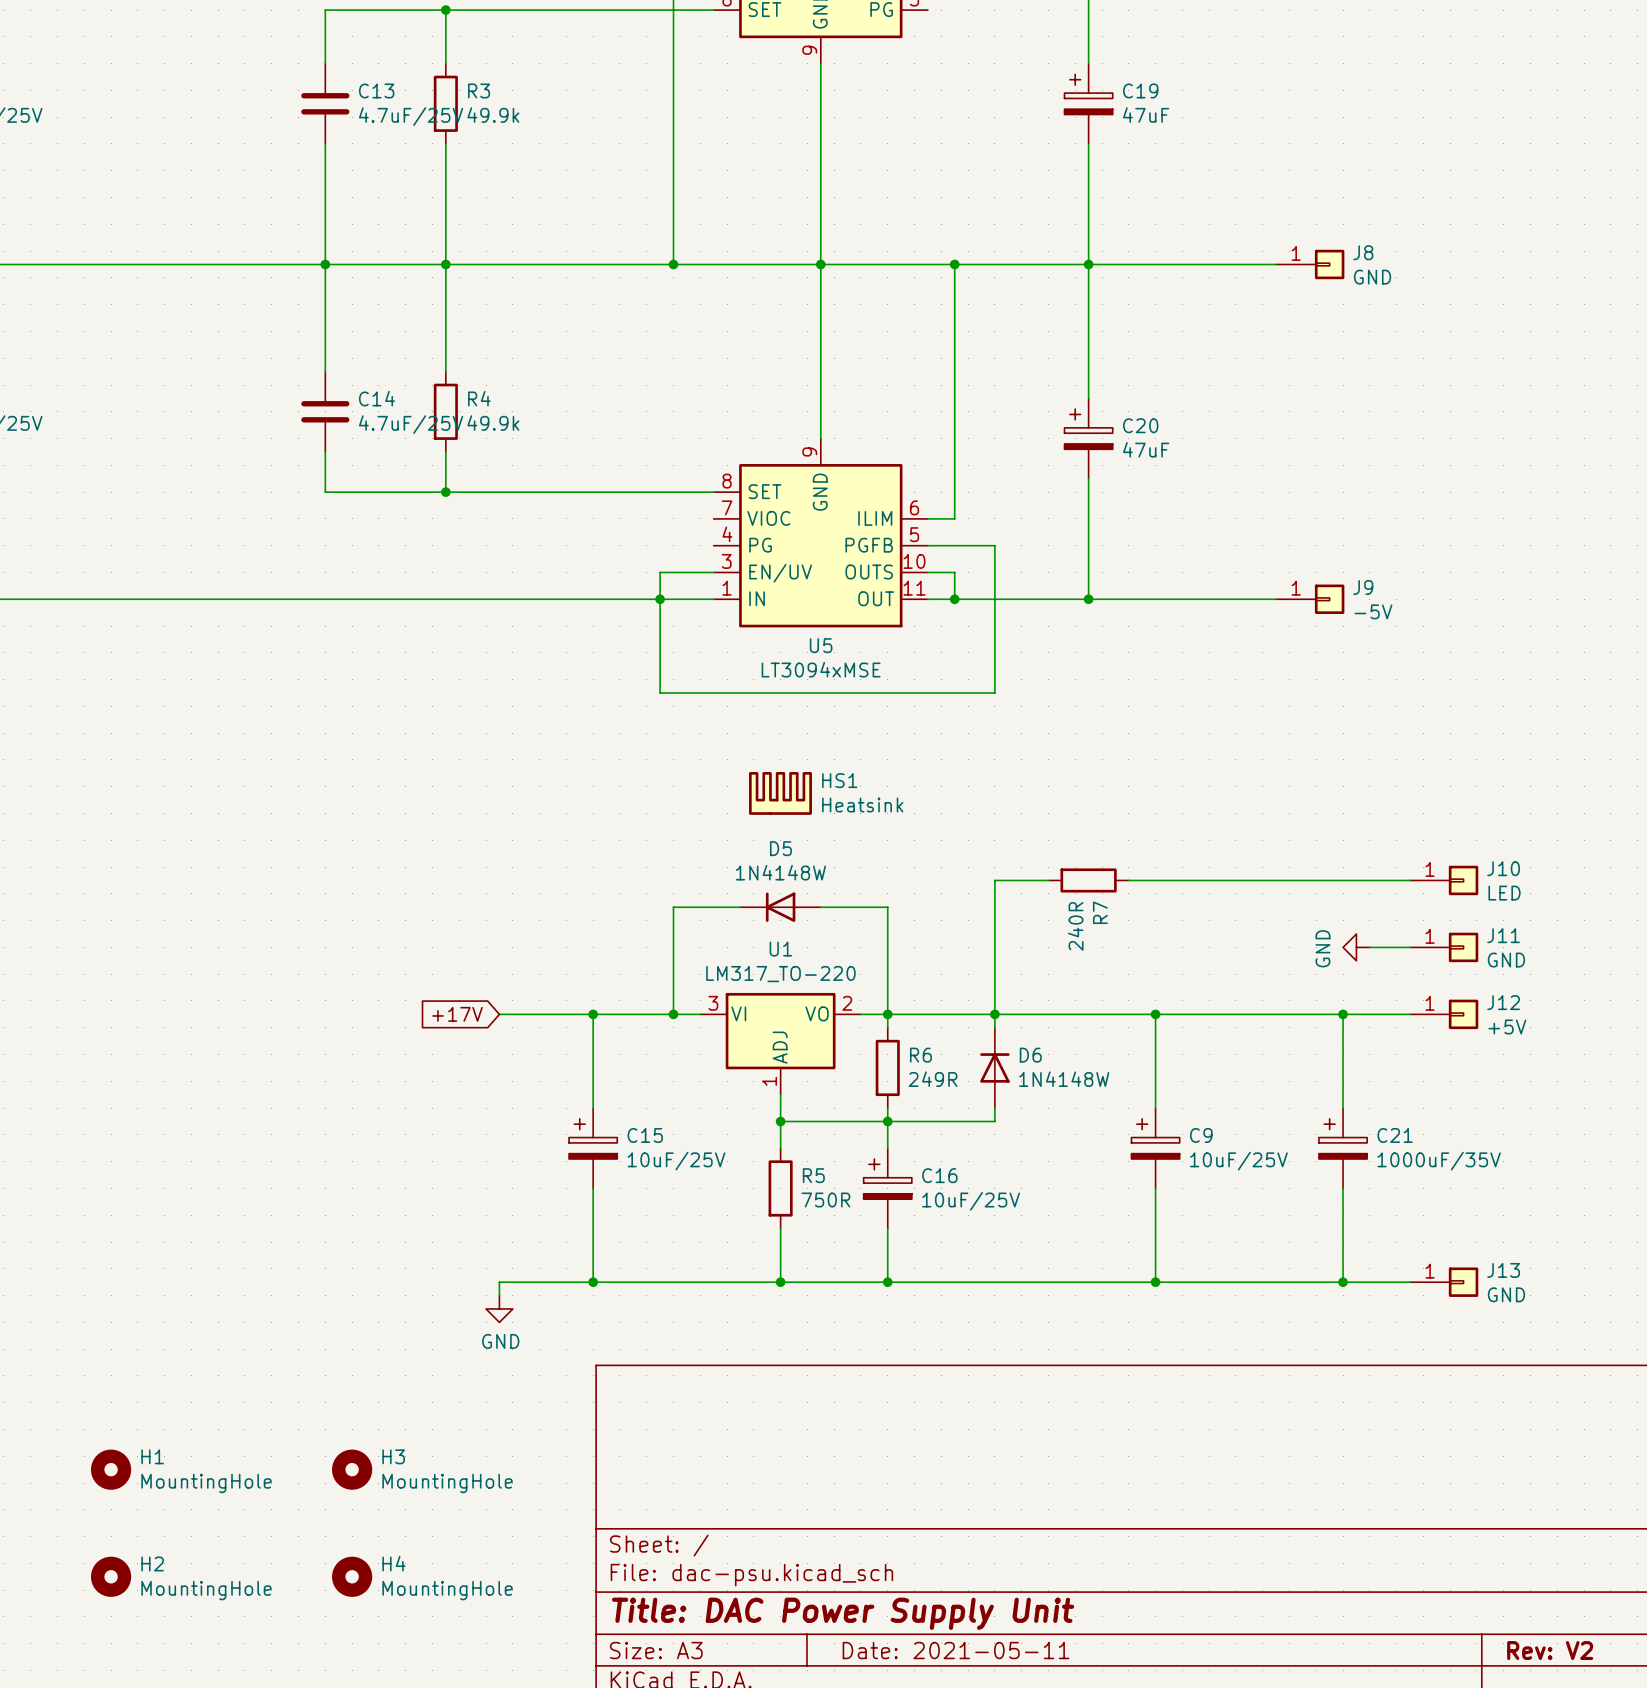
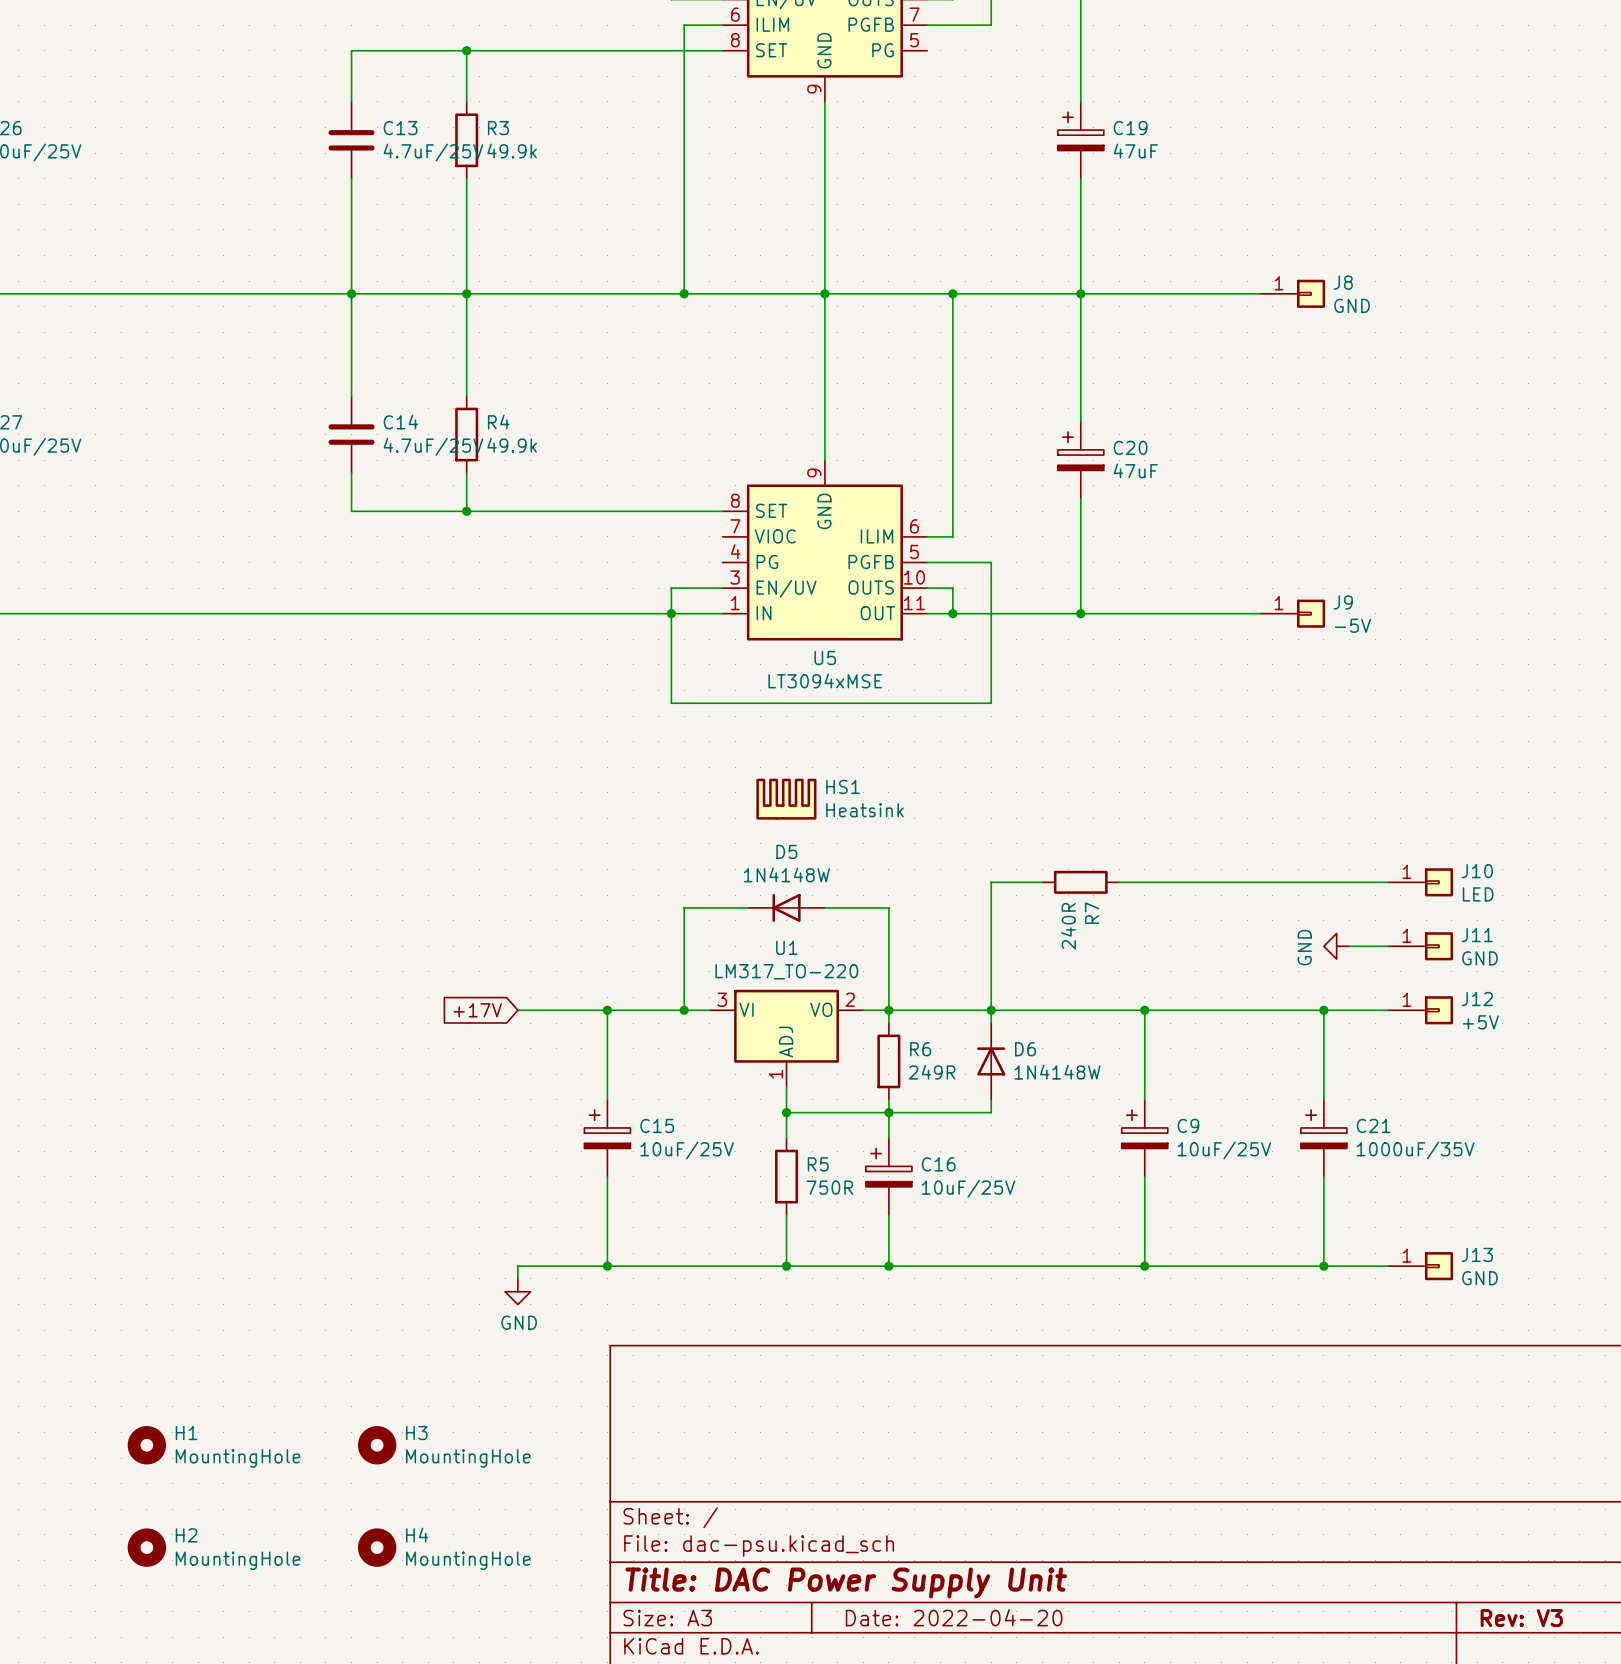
title block: Date: 2021-05-11 (956, 1650) -> Date: 2022-04-20 (954, 1617)
title block: Rev: V2 (1550, 1650) -> Rev: V3 (1521, 1618)

